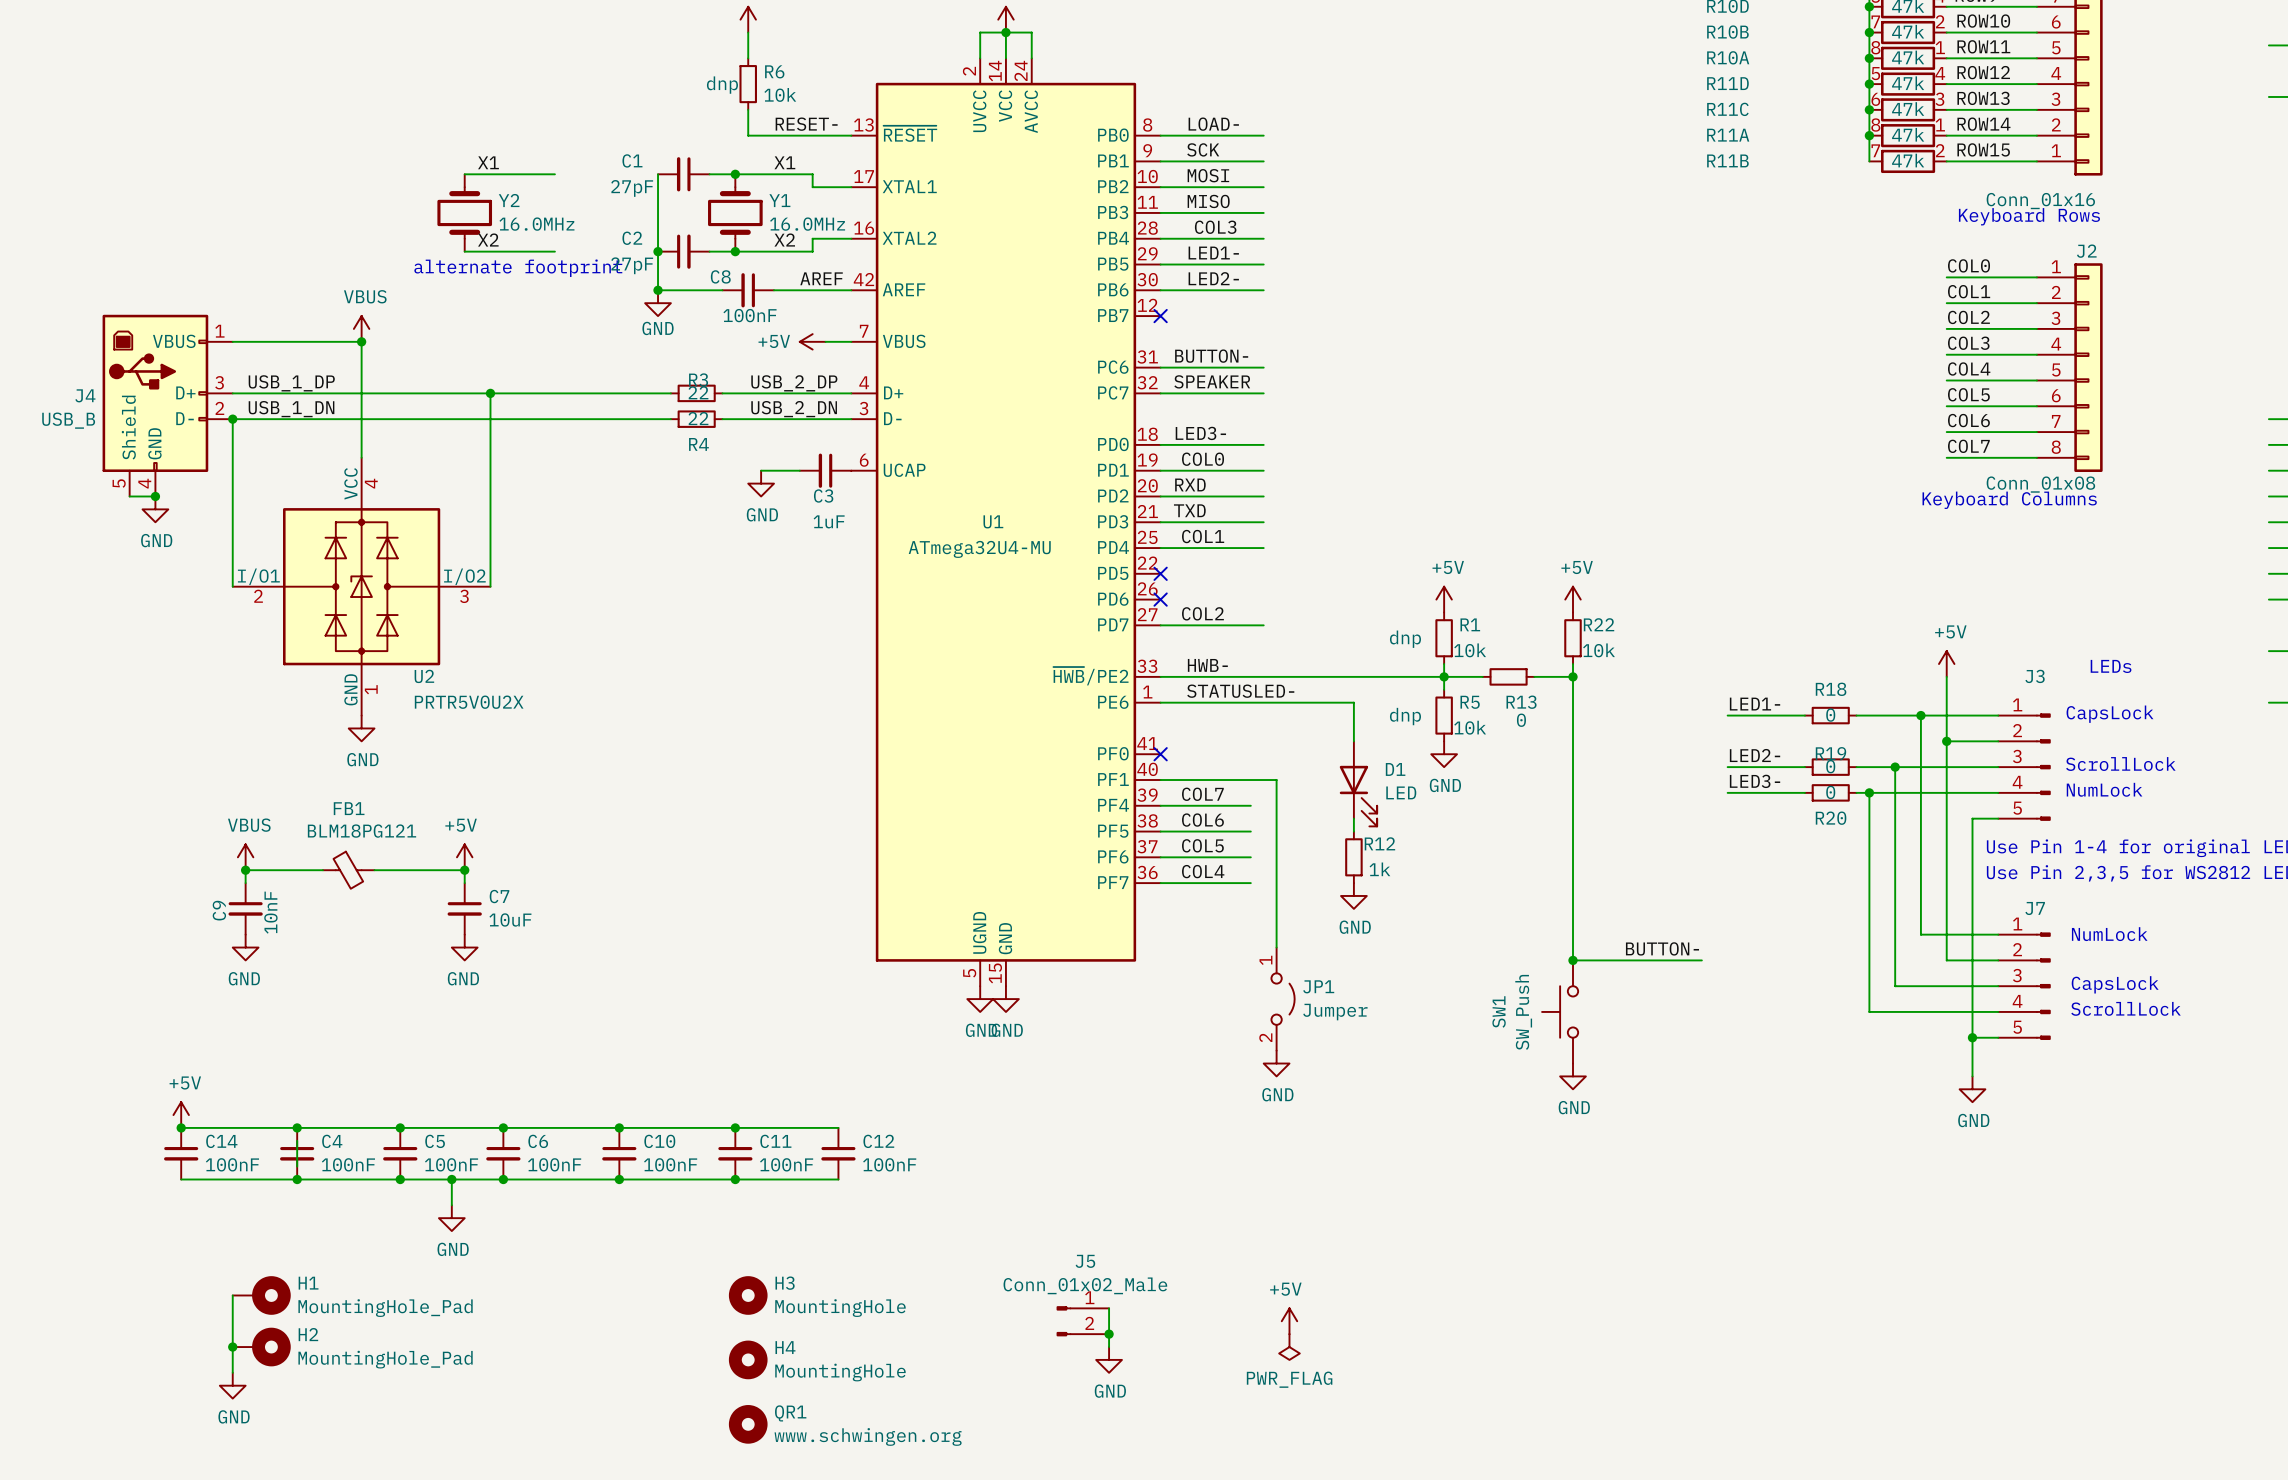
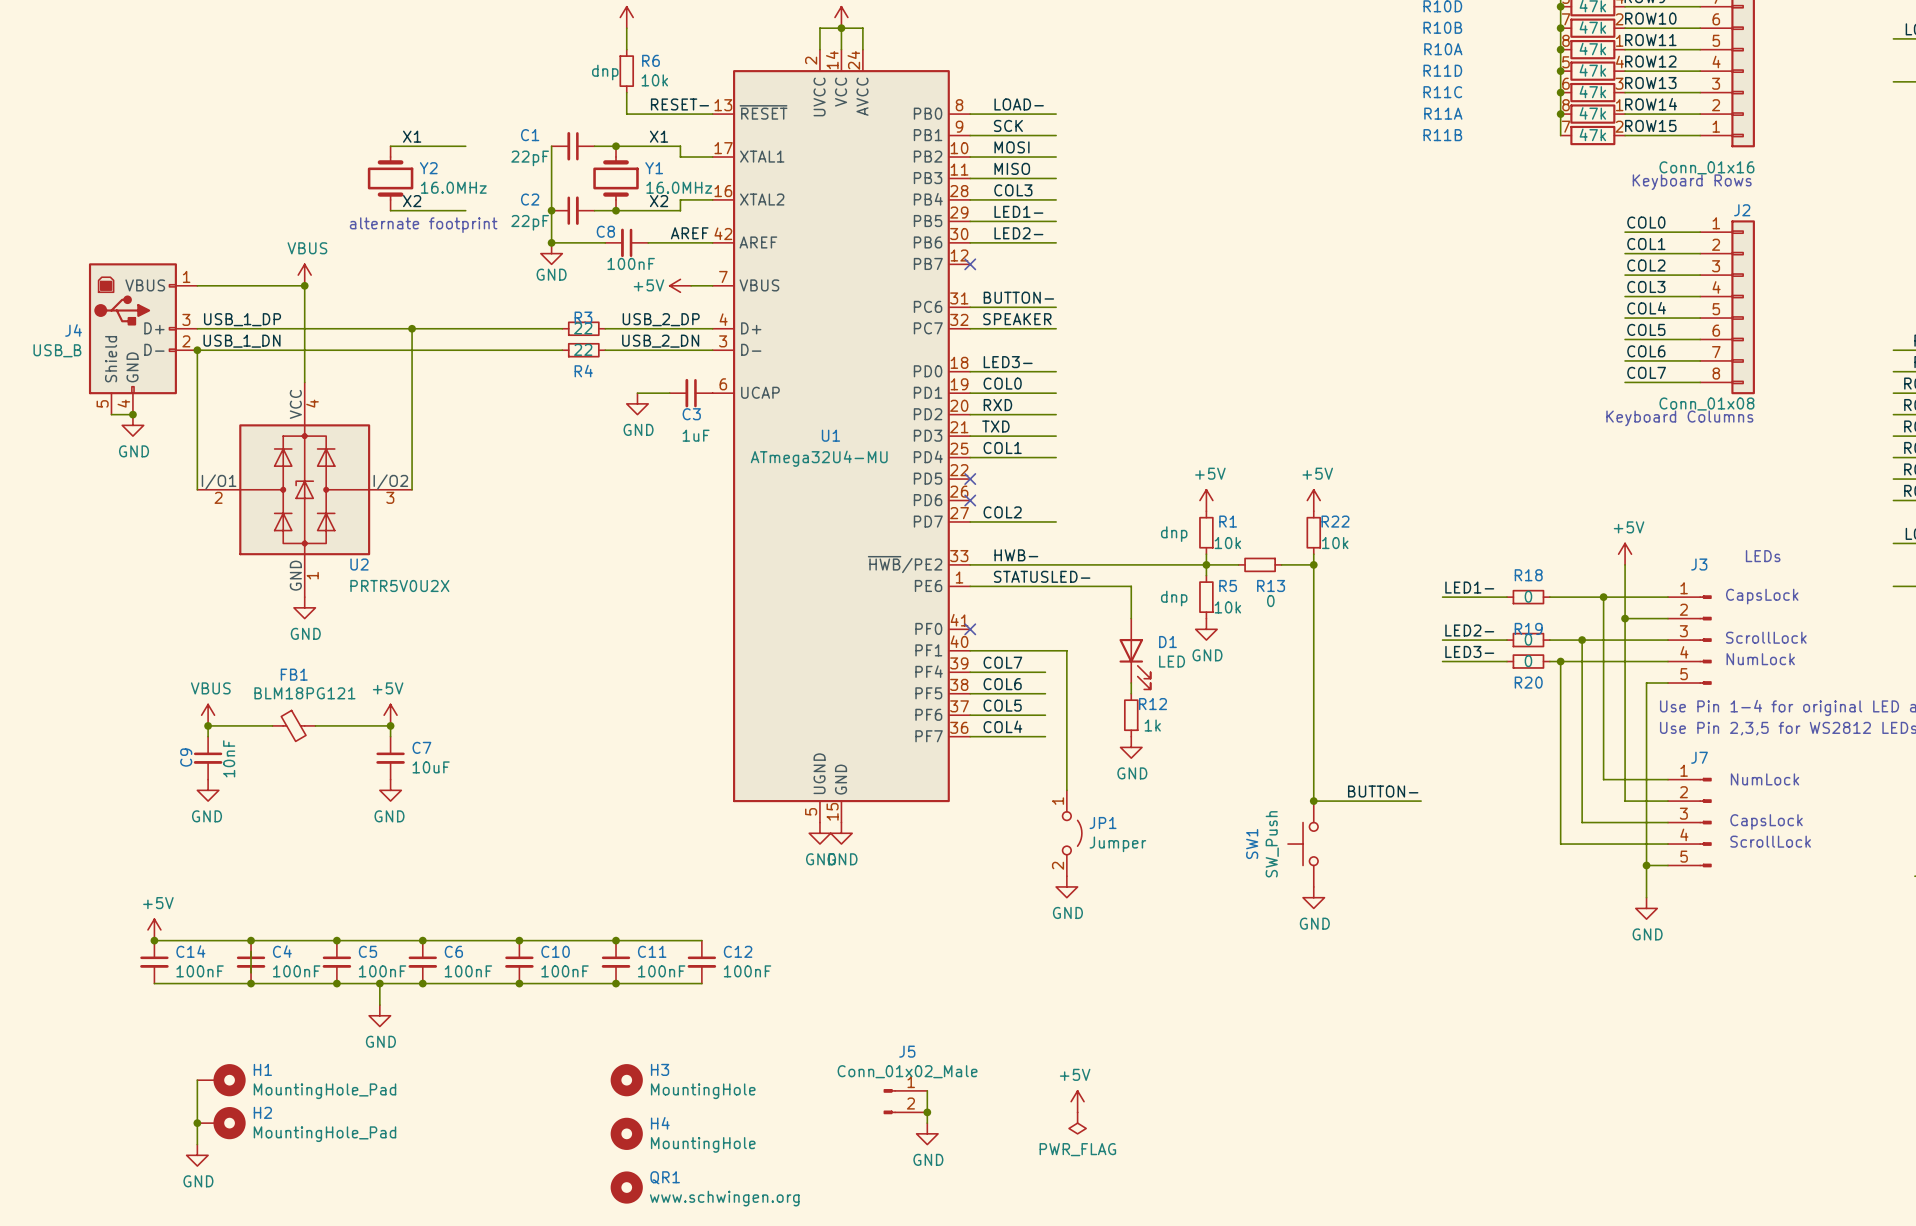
C1 value: 27pF (632, 188) -> 22pF (530, 158)
C2 value: 27pF (632, 265) -> 22pF (530, 222)

